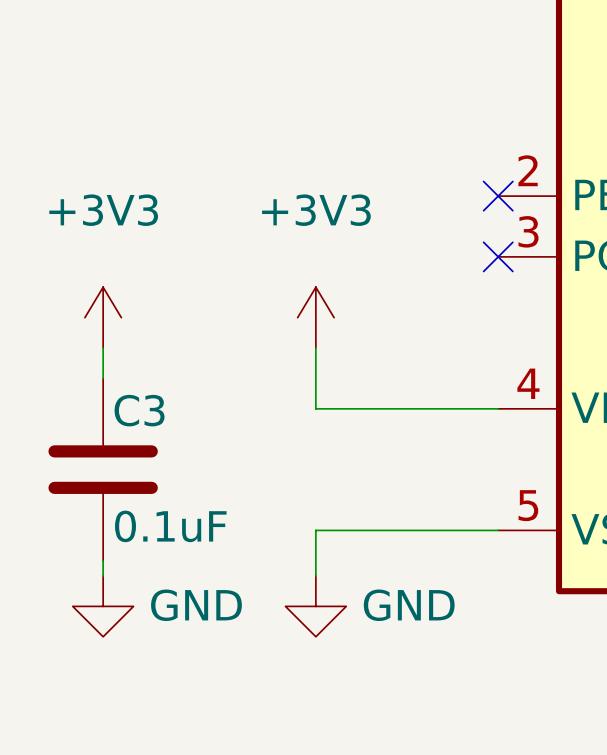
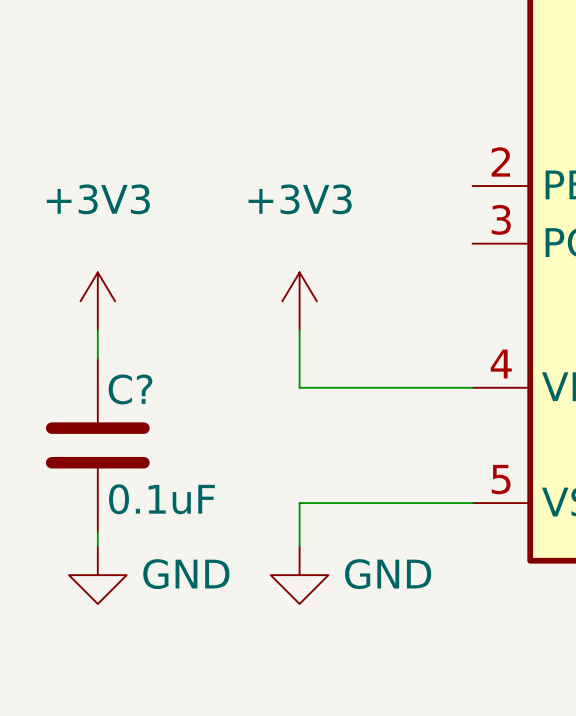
no-connect mark: (498, 196) -> none
no-connect mark: (498, 256) -> none
C3 name: C3 (139, 410) -> C? (130, 389)

